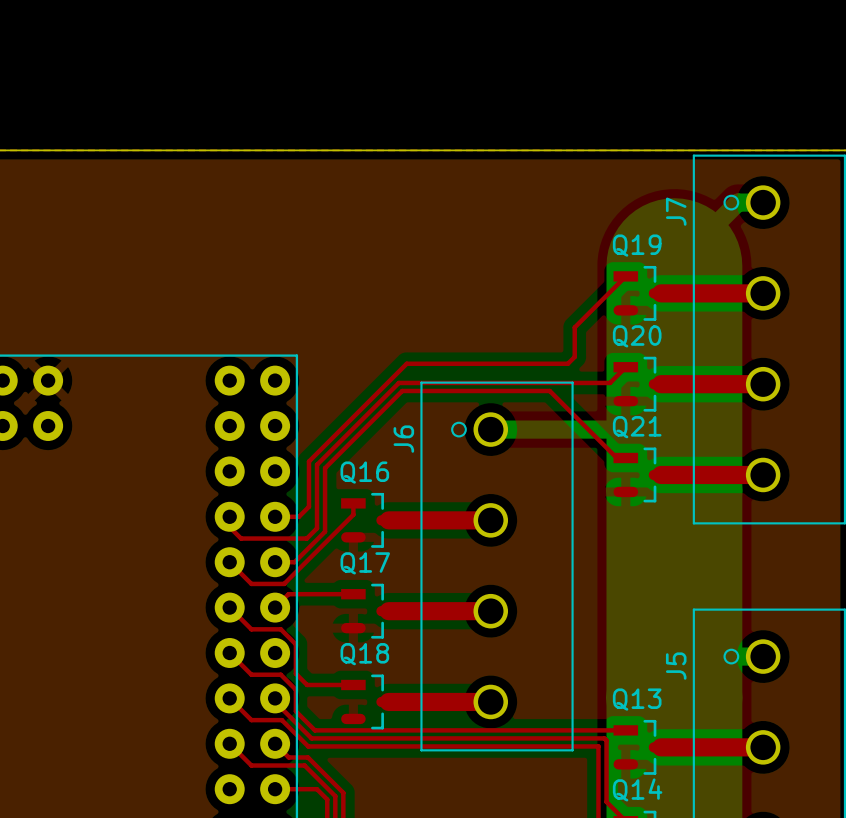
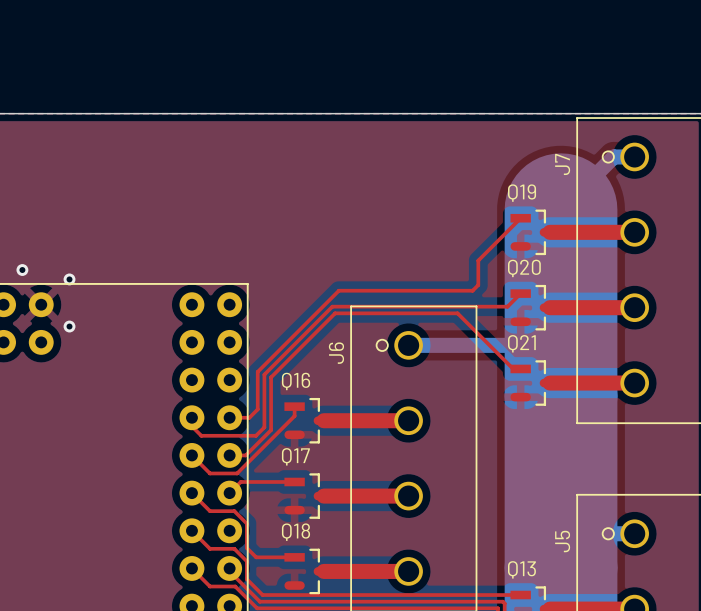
via: none -> (22, 270)
via: none -> (69, 279)
via: none -> (69, 326)

